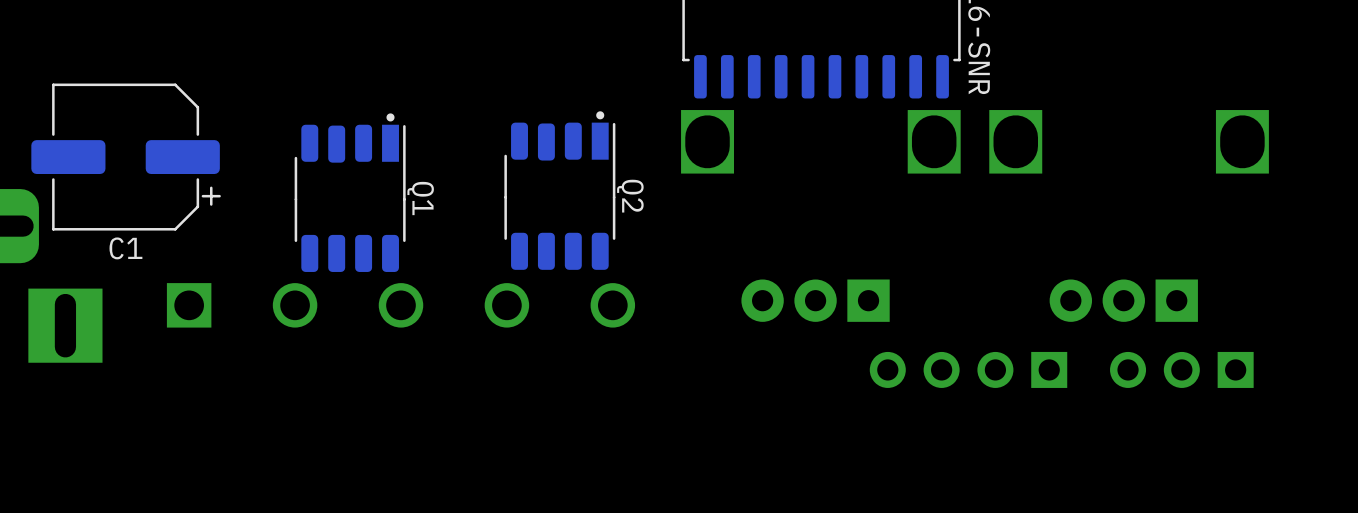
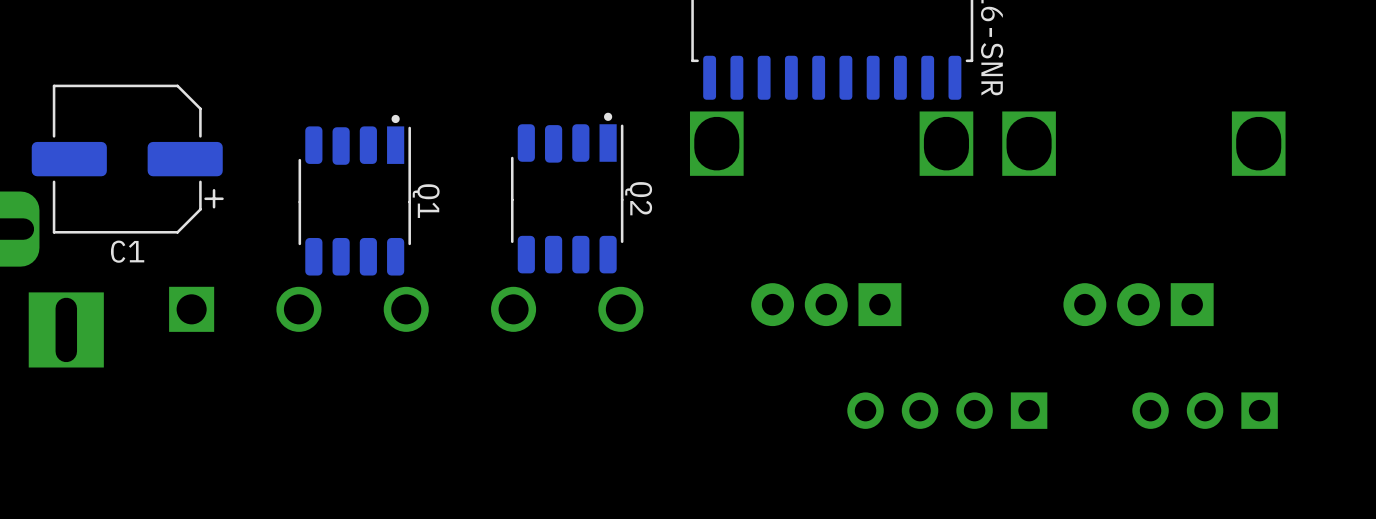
part position: (968, 369) -> (947, 410)
part position: (1181, 369) -> (1205, 410)

